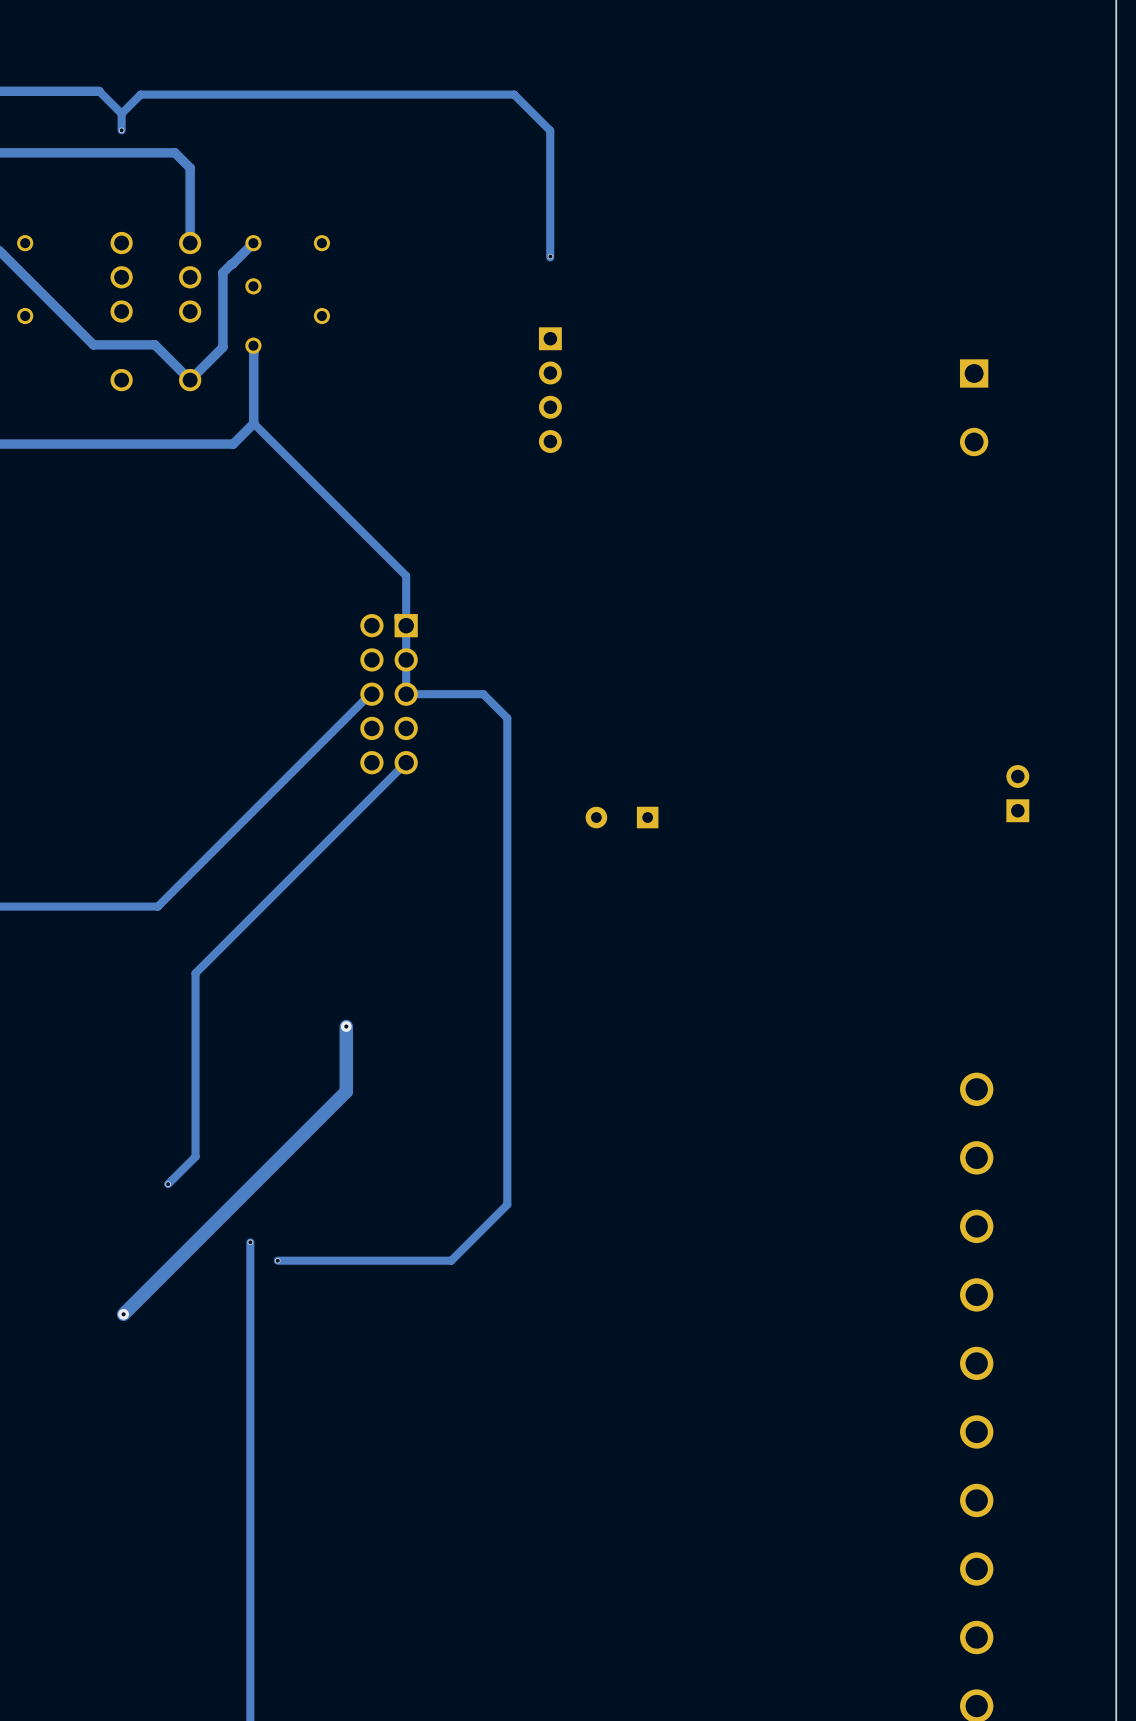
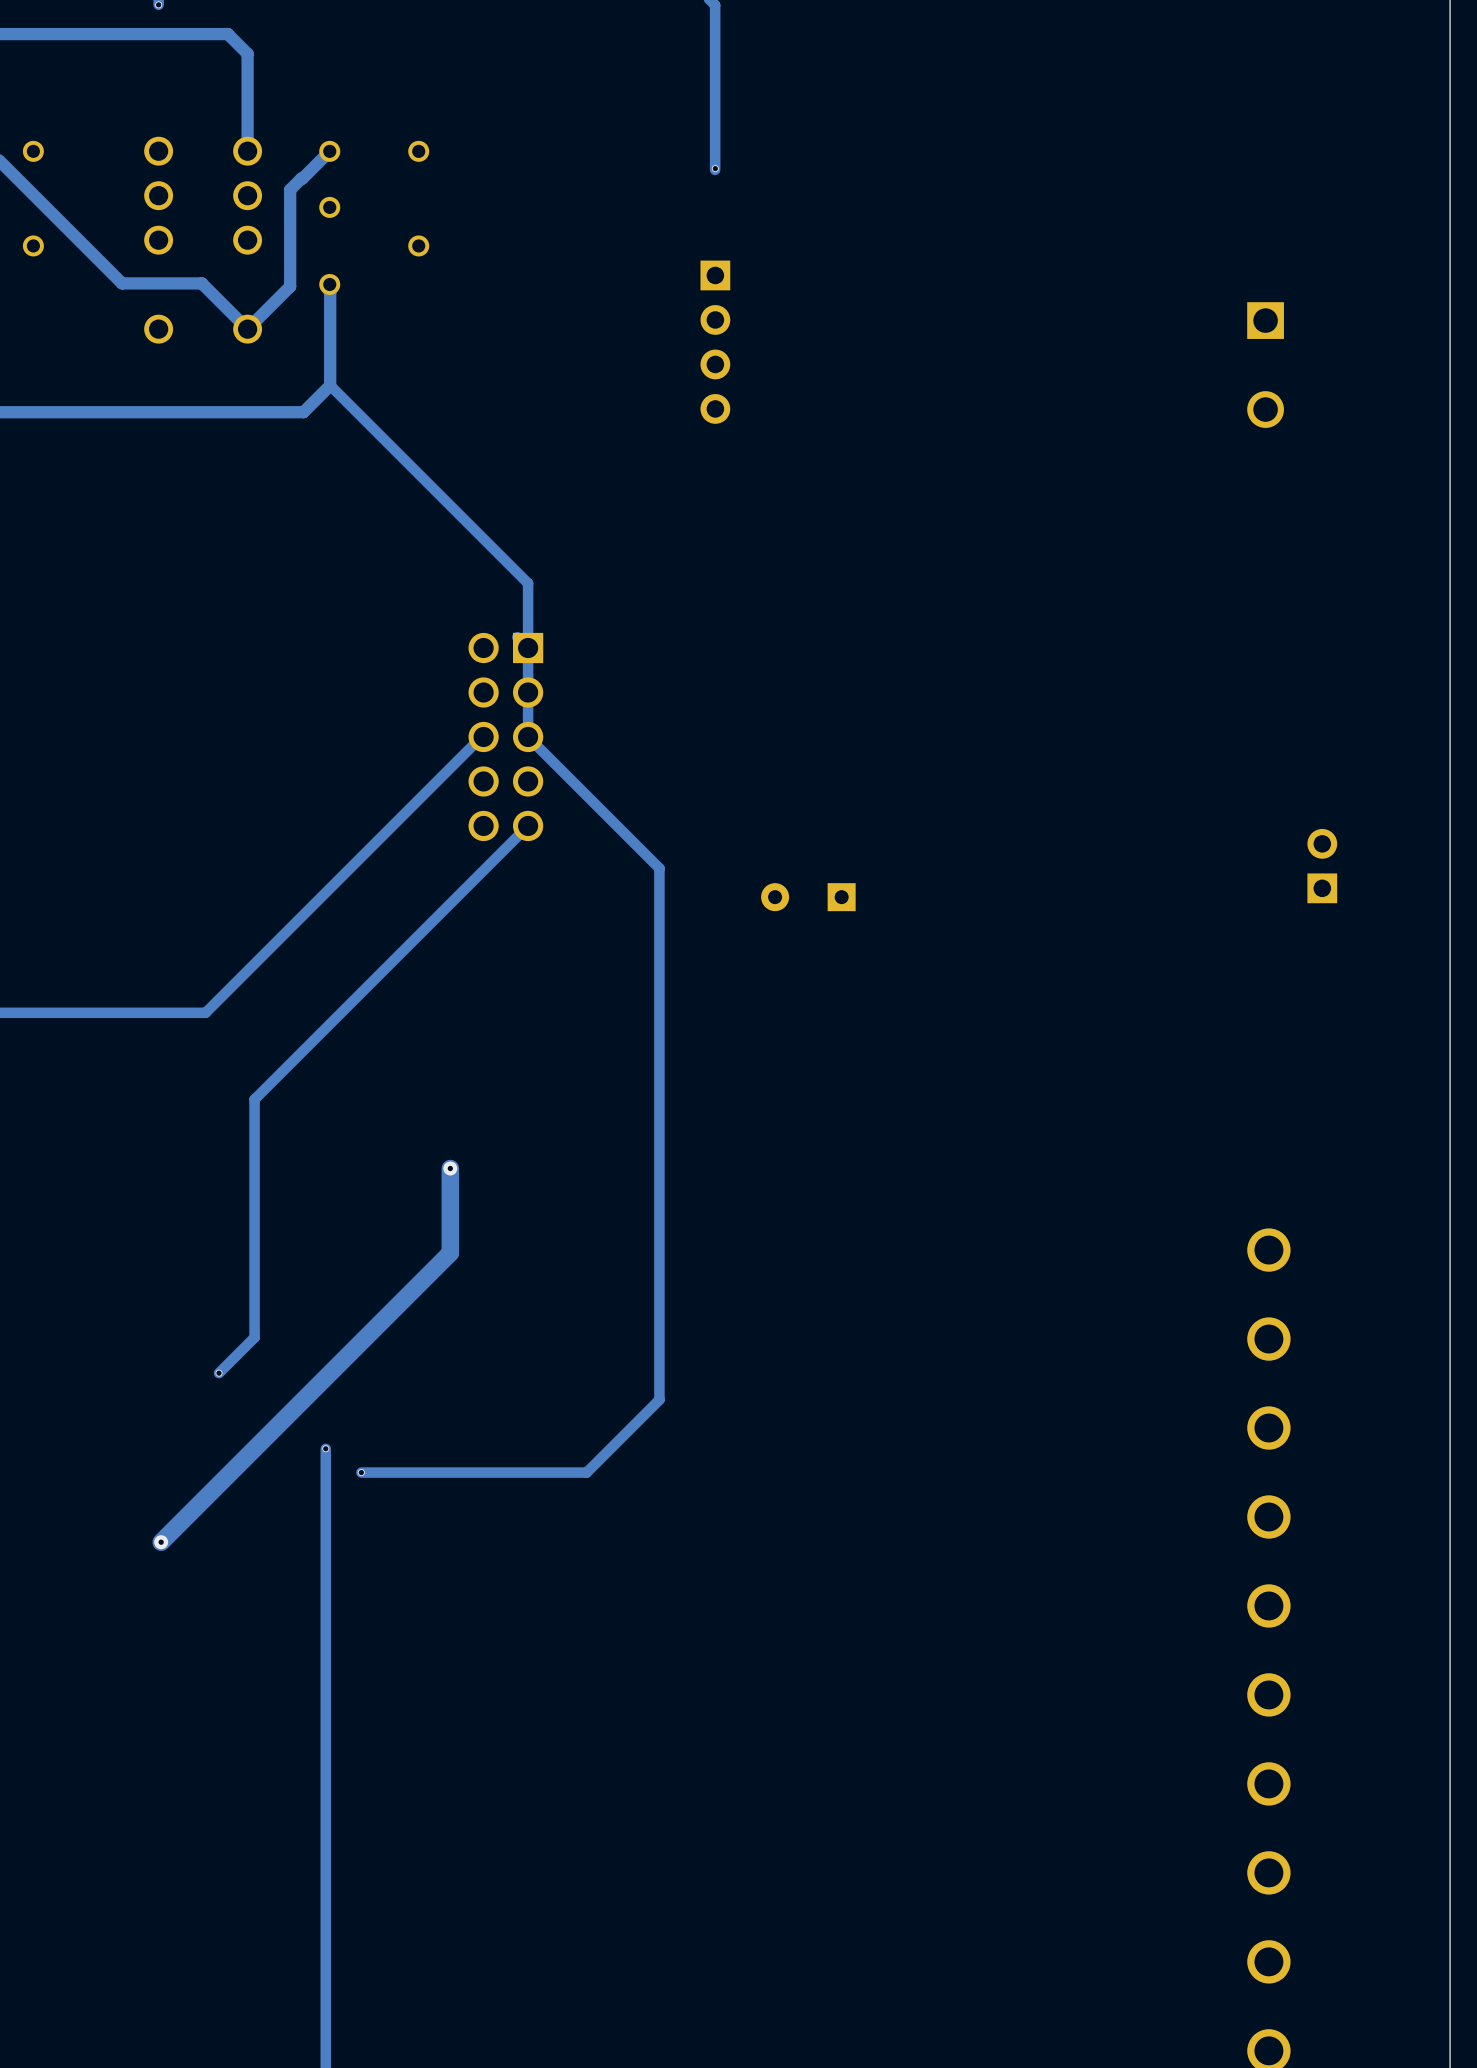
track: (406, 694) (483, 694) (507, 718) (507, 795) -> (528, 736) (659, 868)

